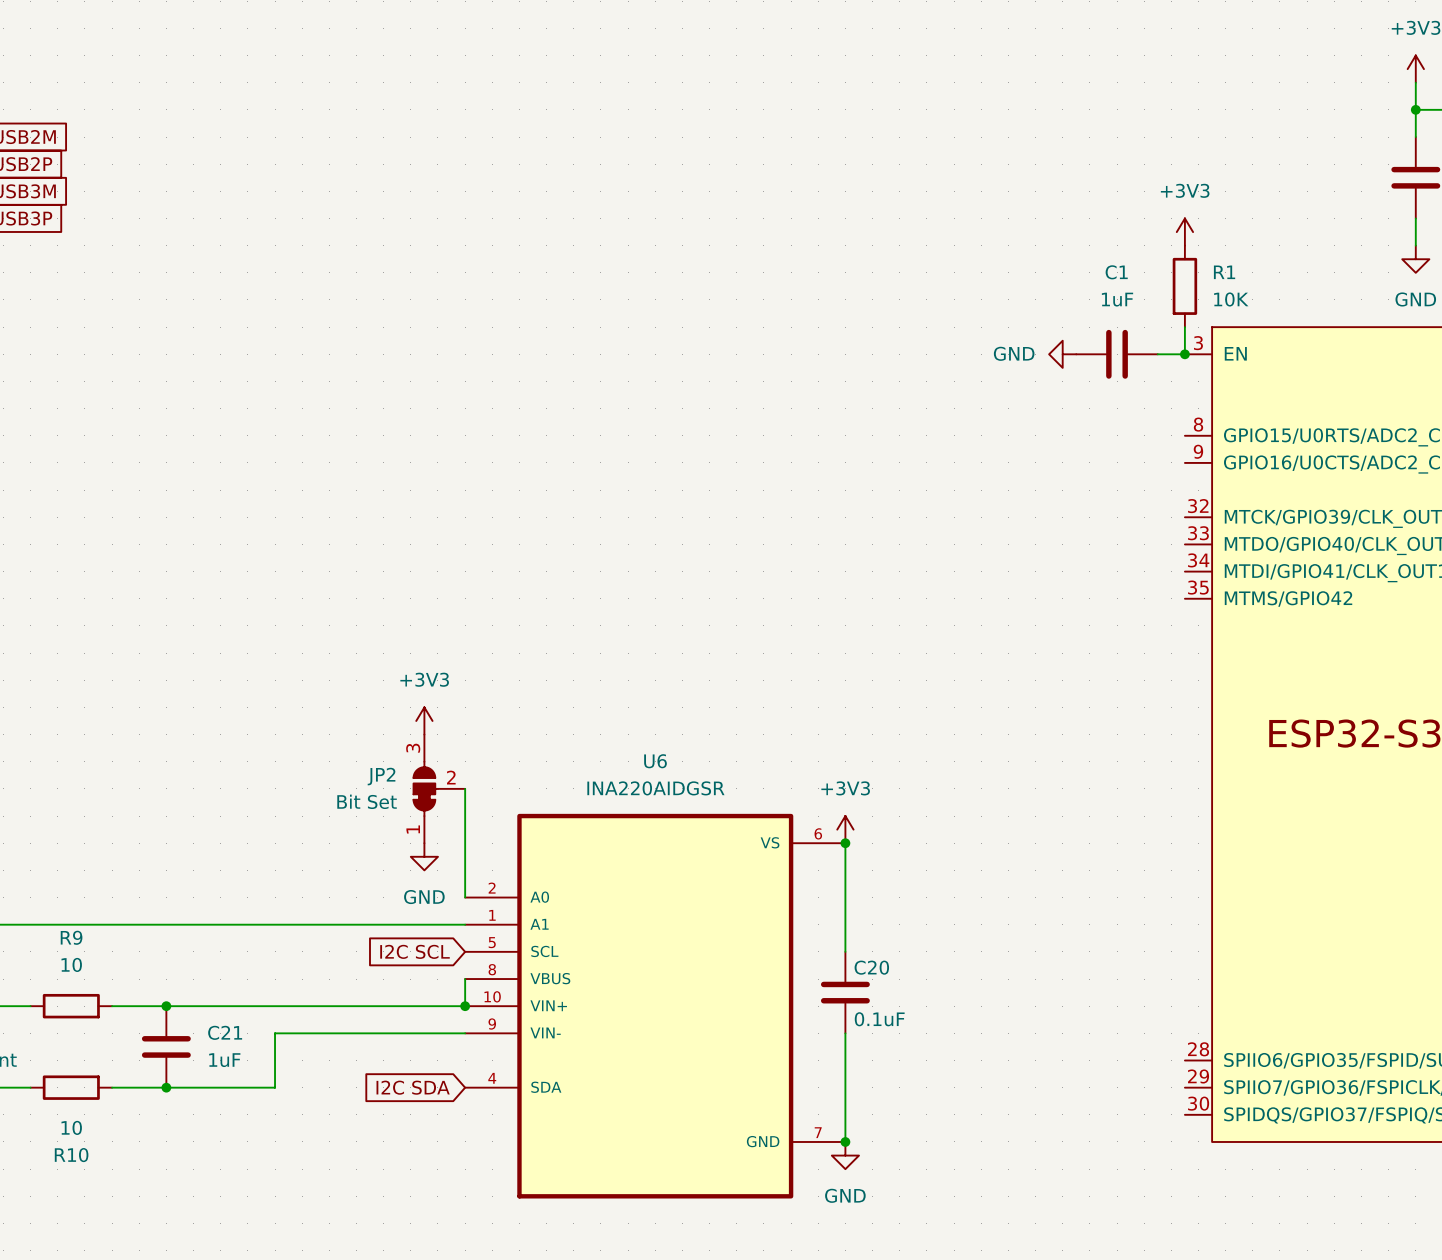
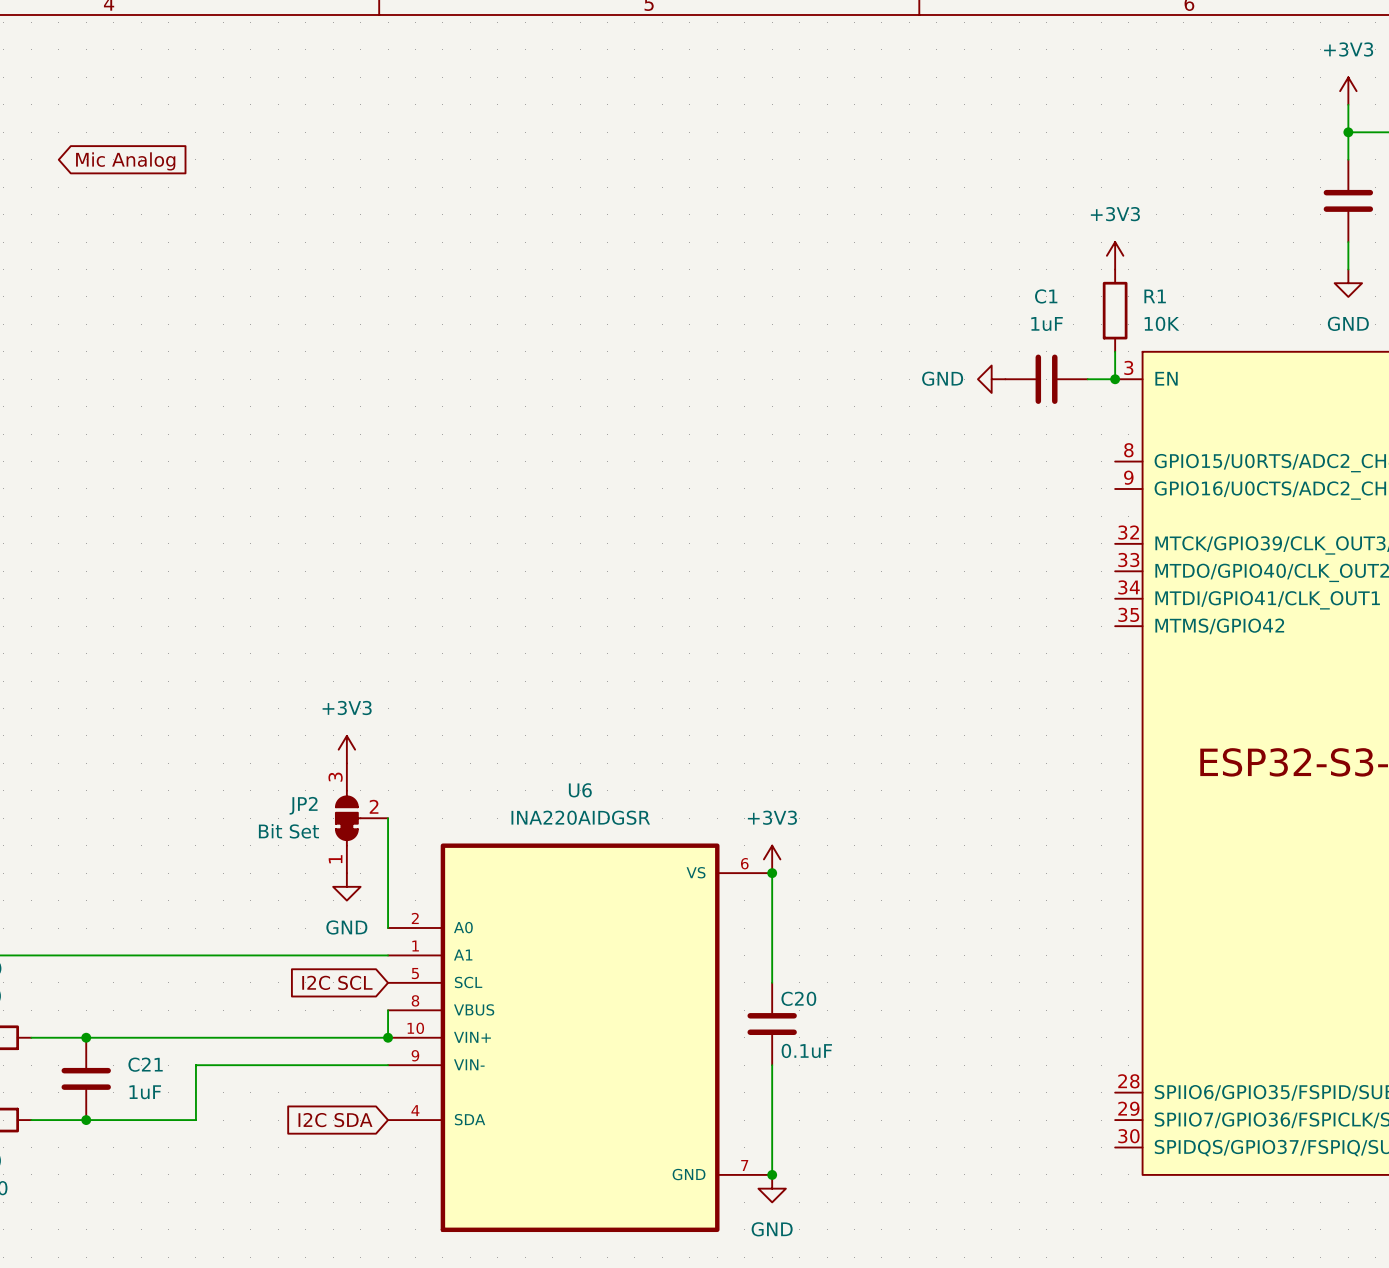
global label: none -> Mic Analog (125, 161)

